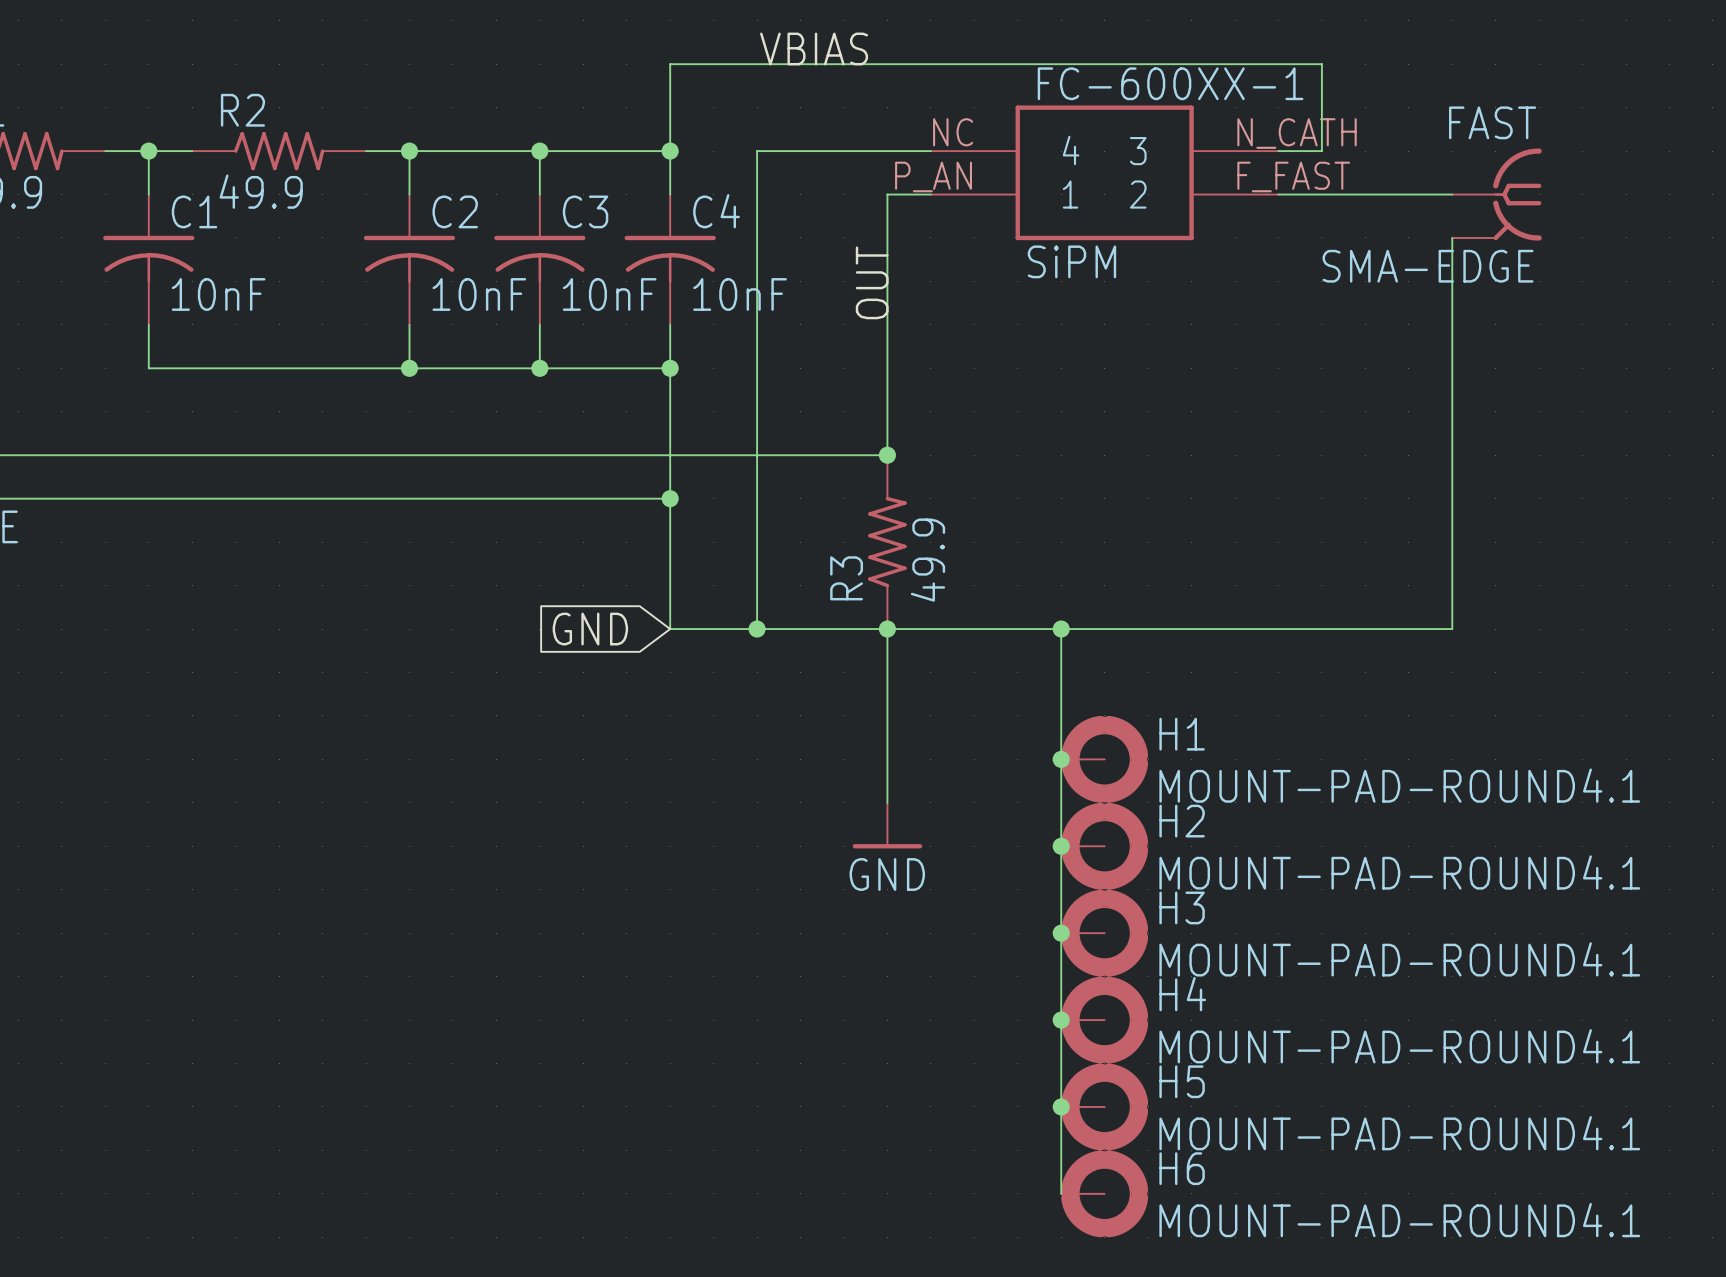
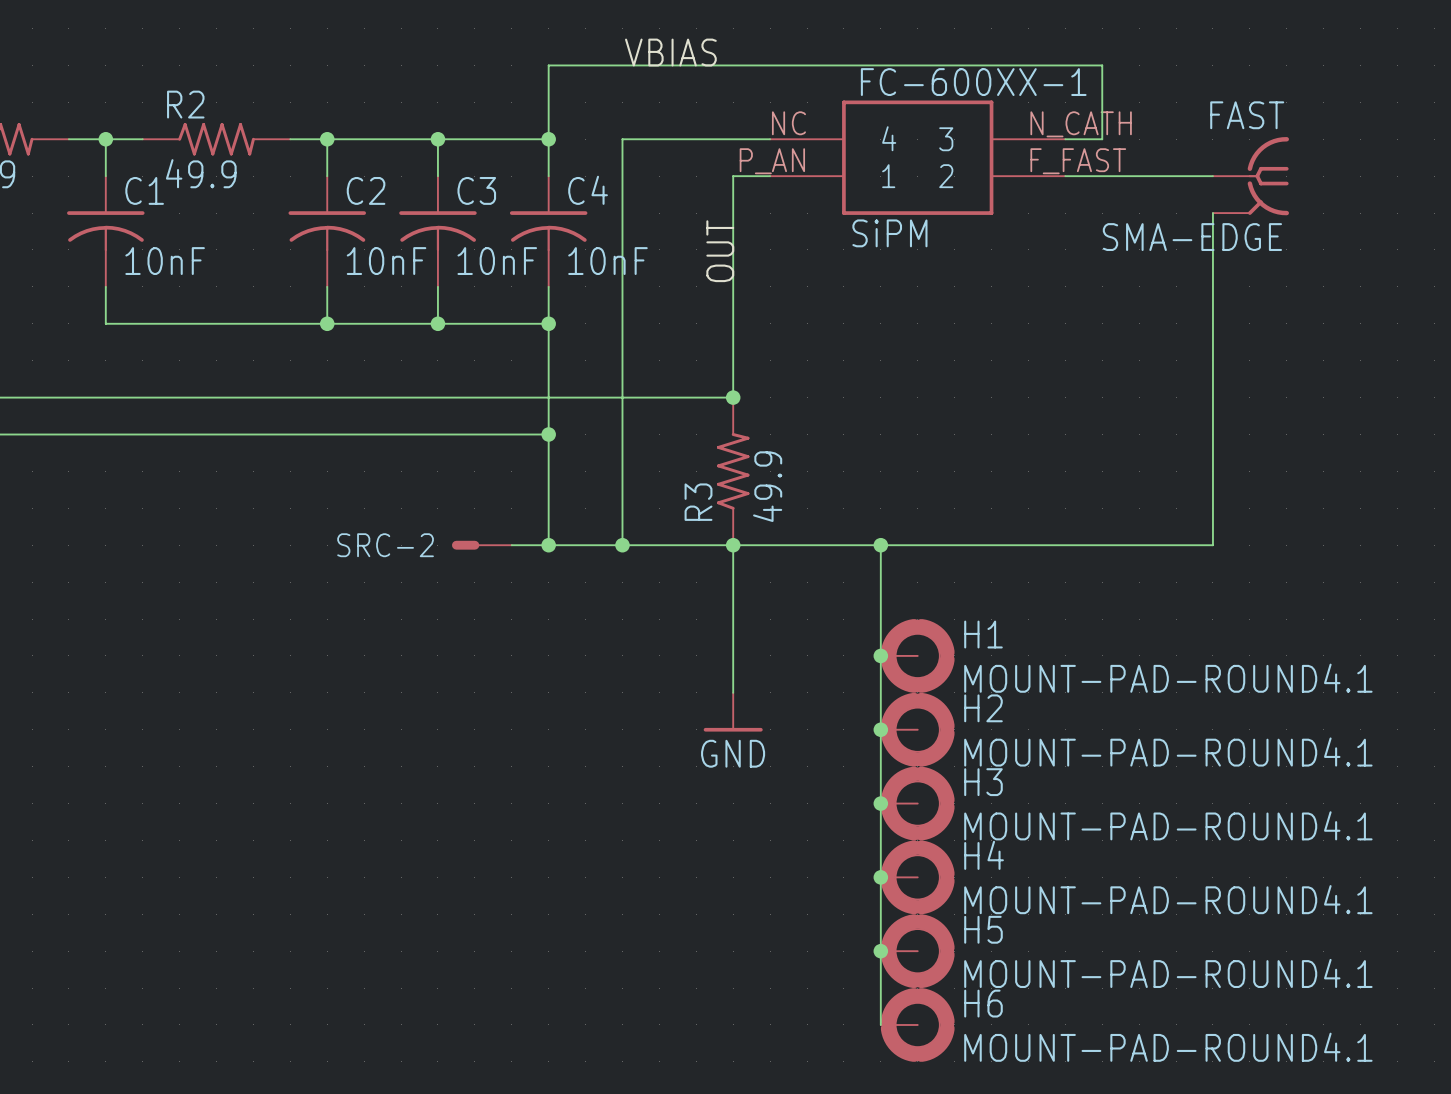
global label: GND (590, 629) -> none
SRC-2: none -> (481, 545)
wire: none -> (511, 545) (548, 545)
junction: none -> (548, 545)

